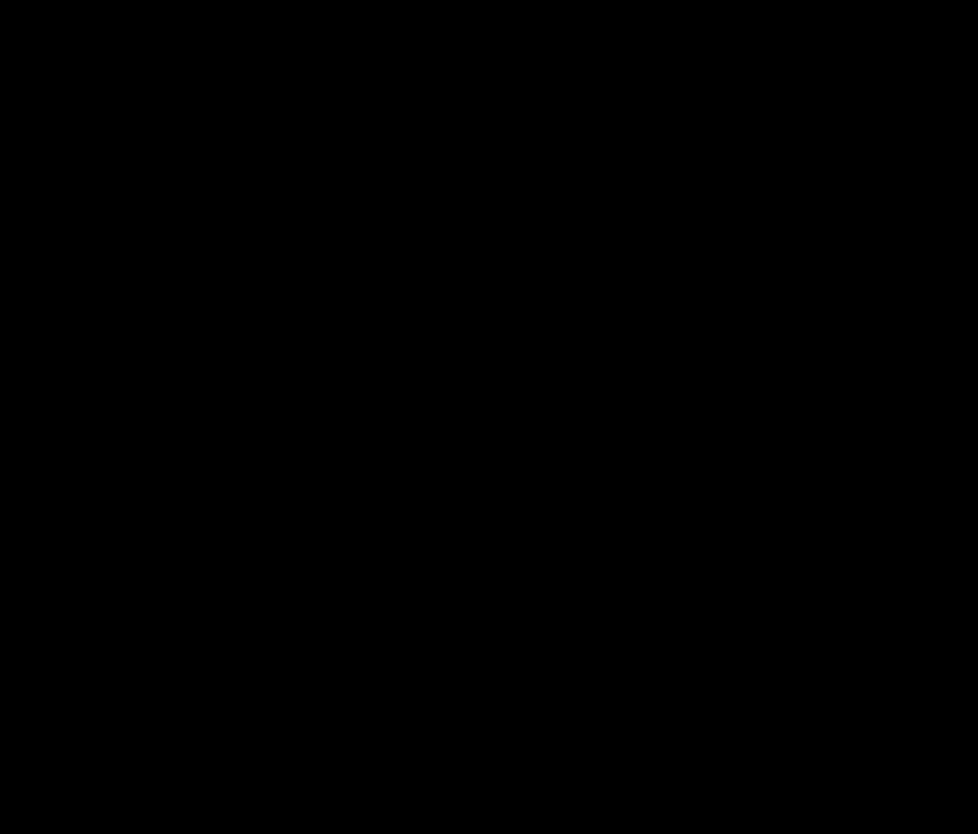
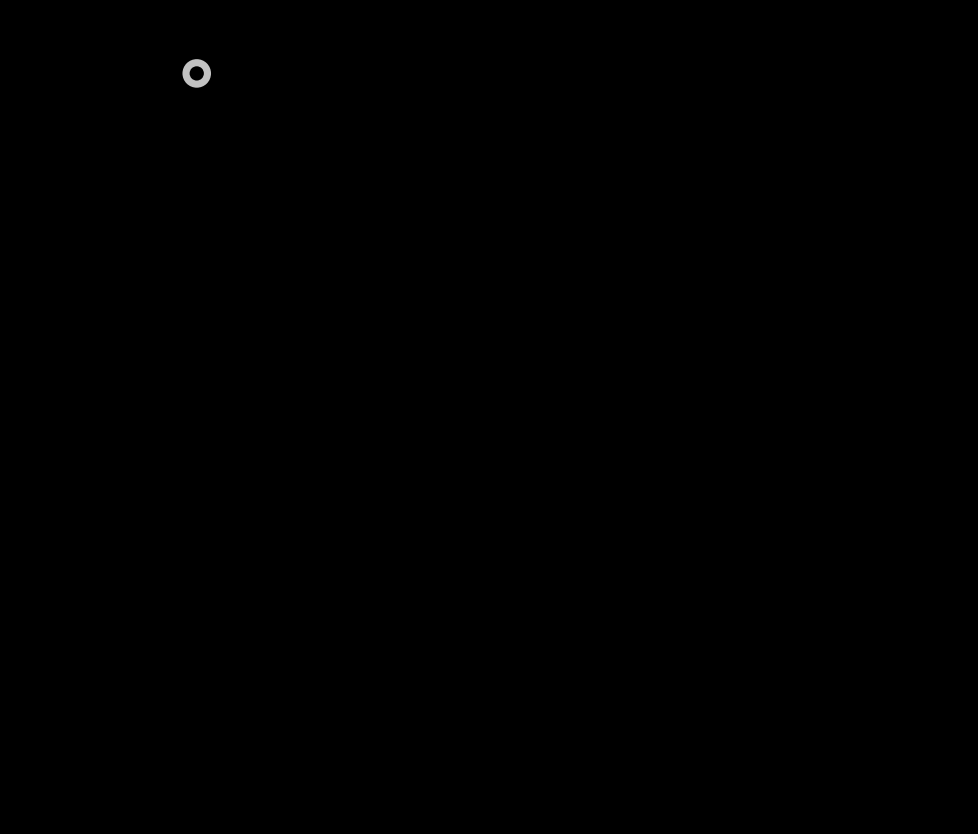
via: none -> (196, 73)

